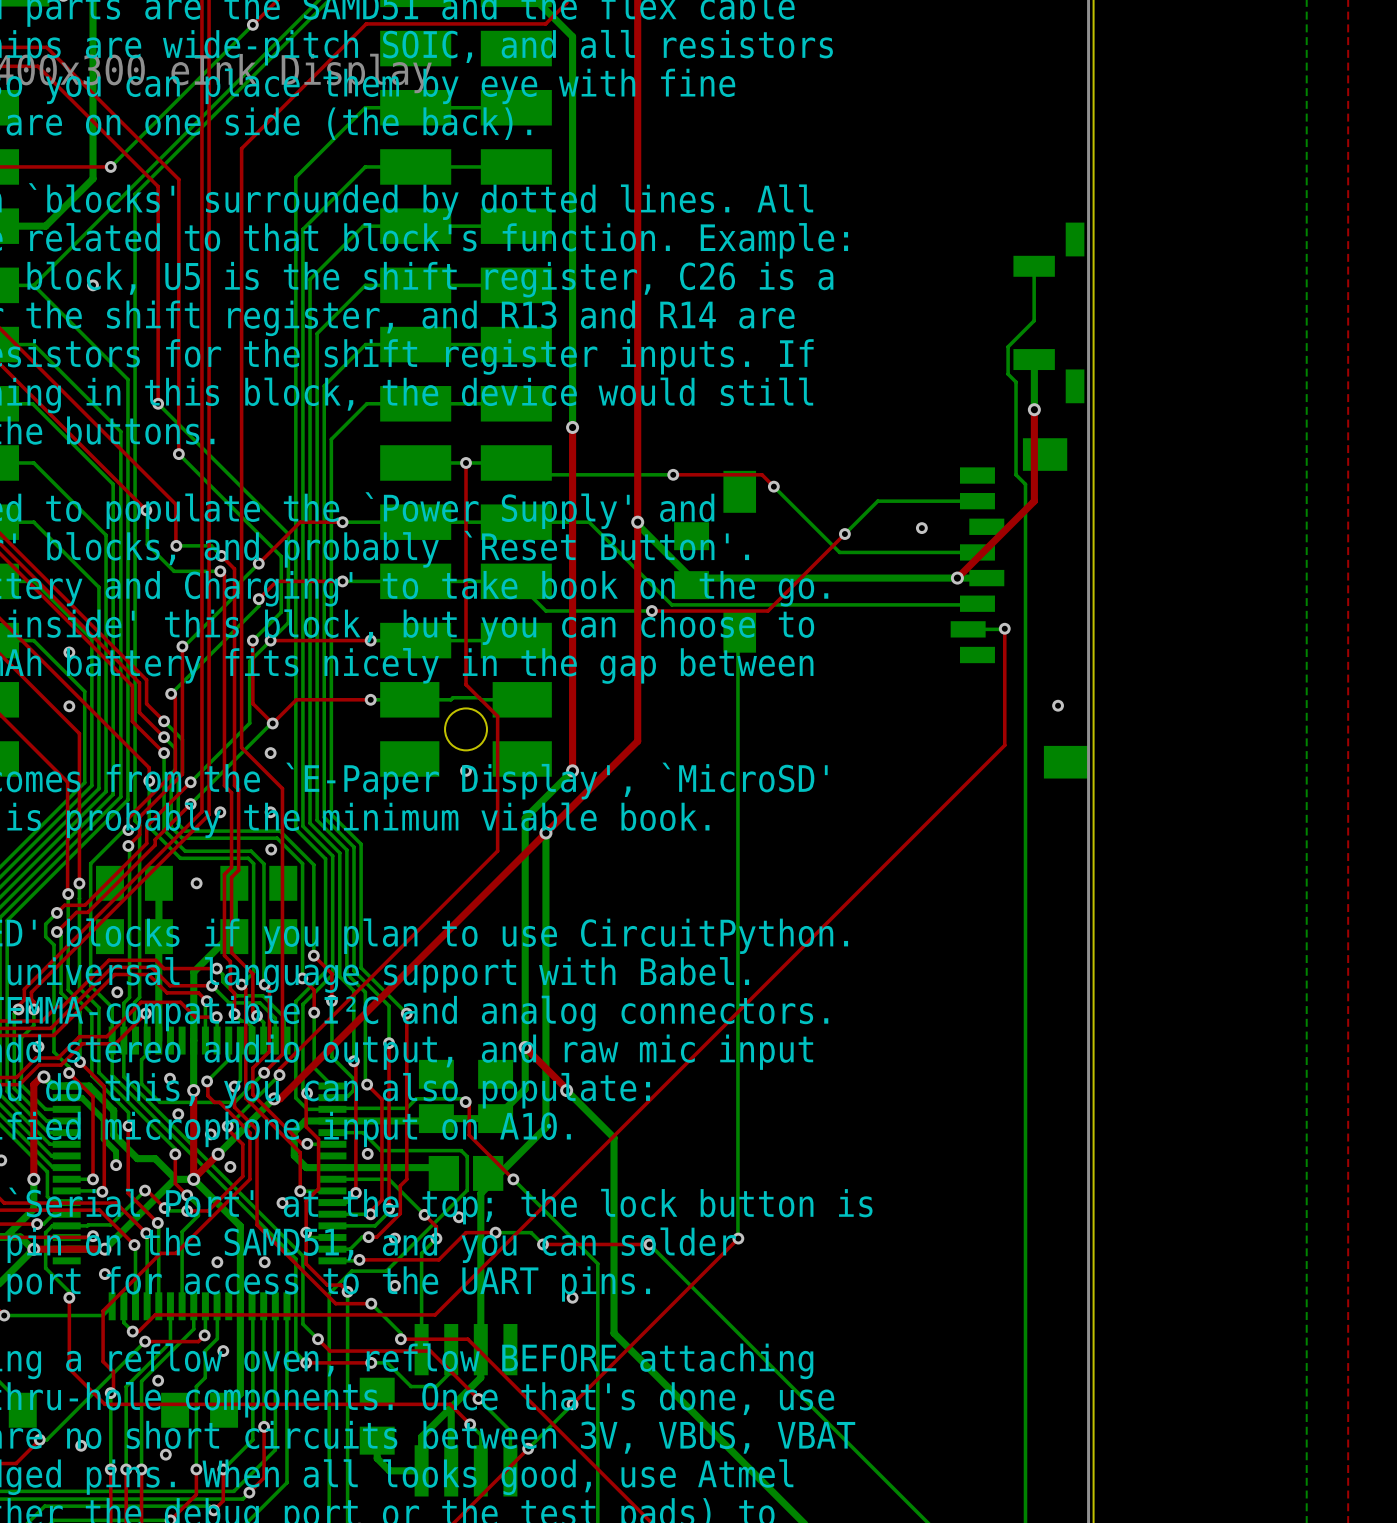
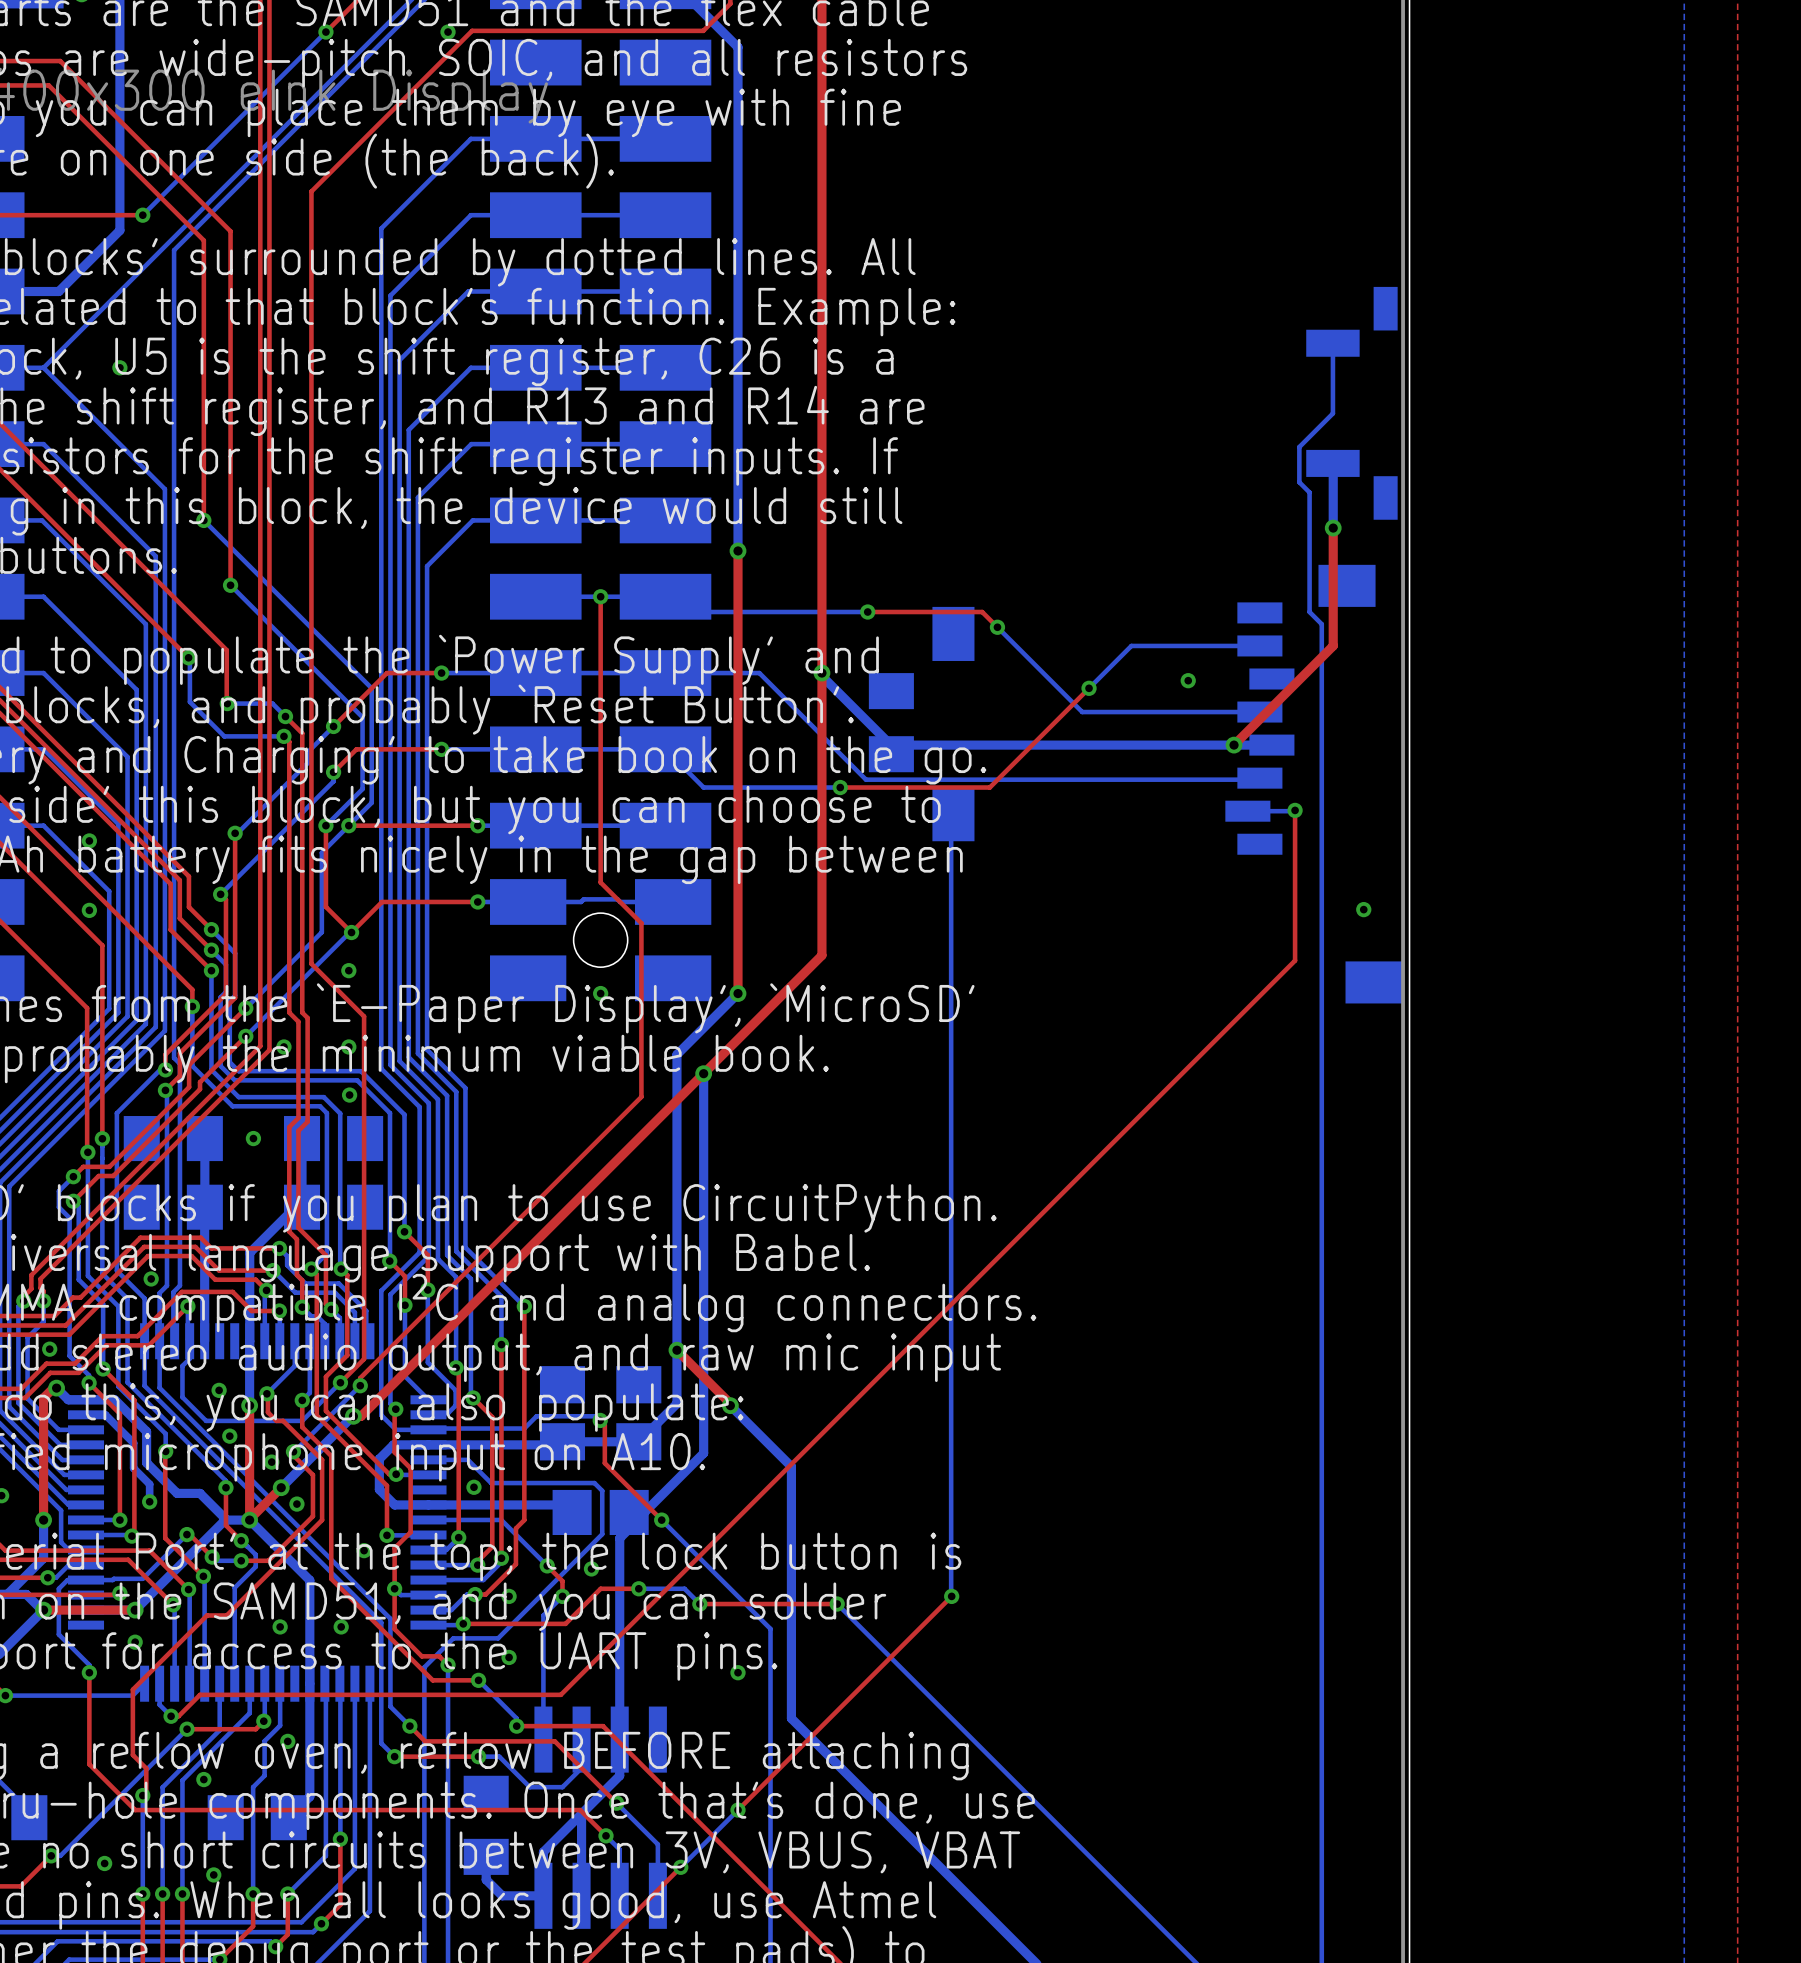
via: none -> (448, 32)

